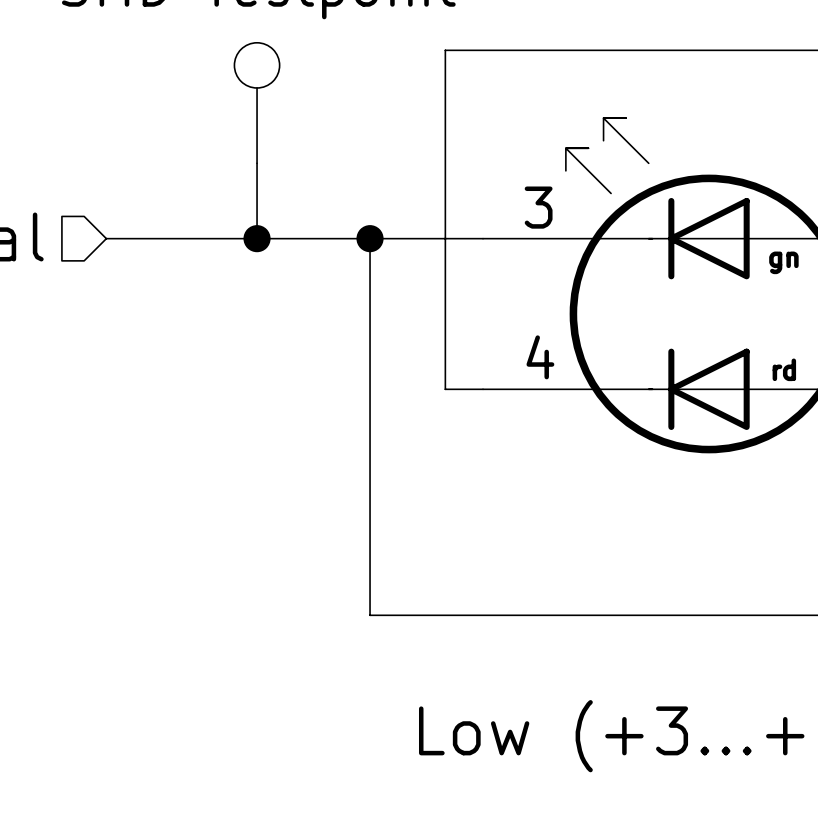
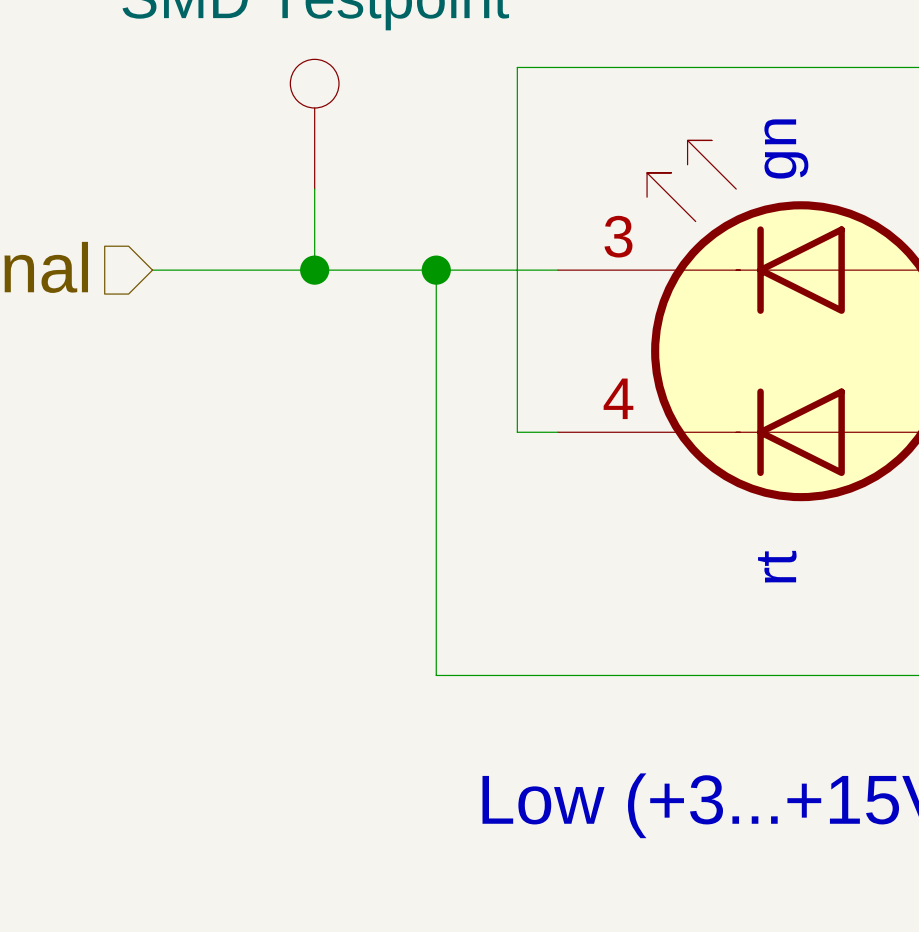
text: none -> gn (786, 148)
part text: gn (783, 262) -> none
part text: rd (784, 369) -> none
text: none -> rt (777, 566)

